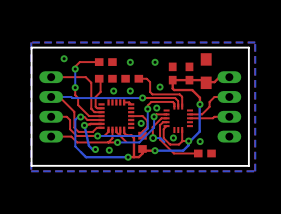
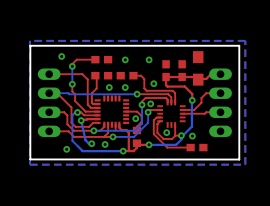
top track: (124, 102) (131, 104) -> none
top track: (166, 118) (161, 118) (152, 127) (153, 138) -> none
top track: (116, 129) (116, 132) (126, 142) -> none
bottom track: (153, 138) (160, 138) (164, 142) -> none
via: (153, 138) -> none
via: none -> (66, 149)

